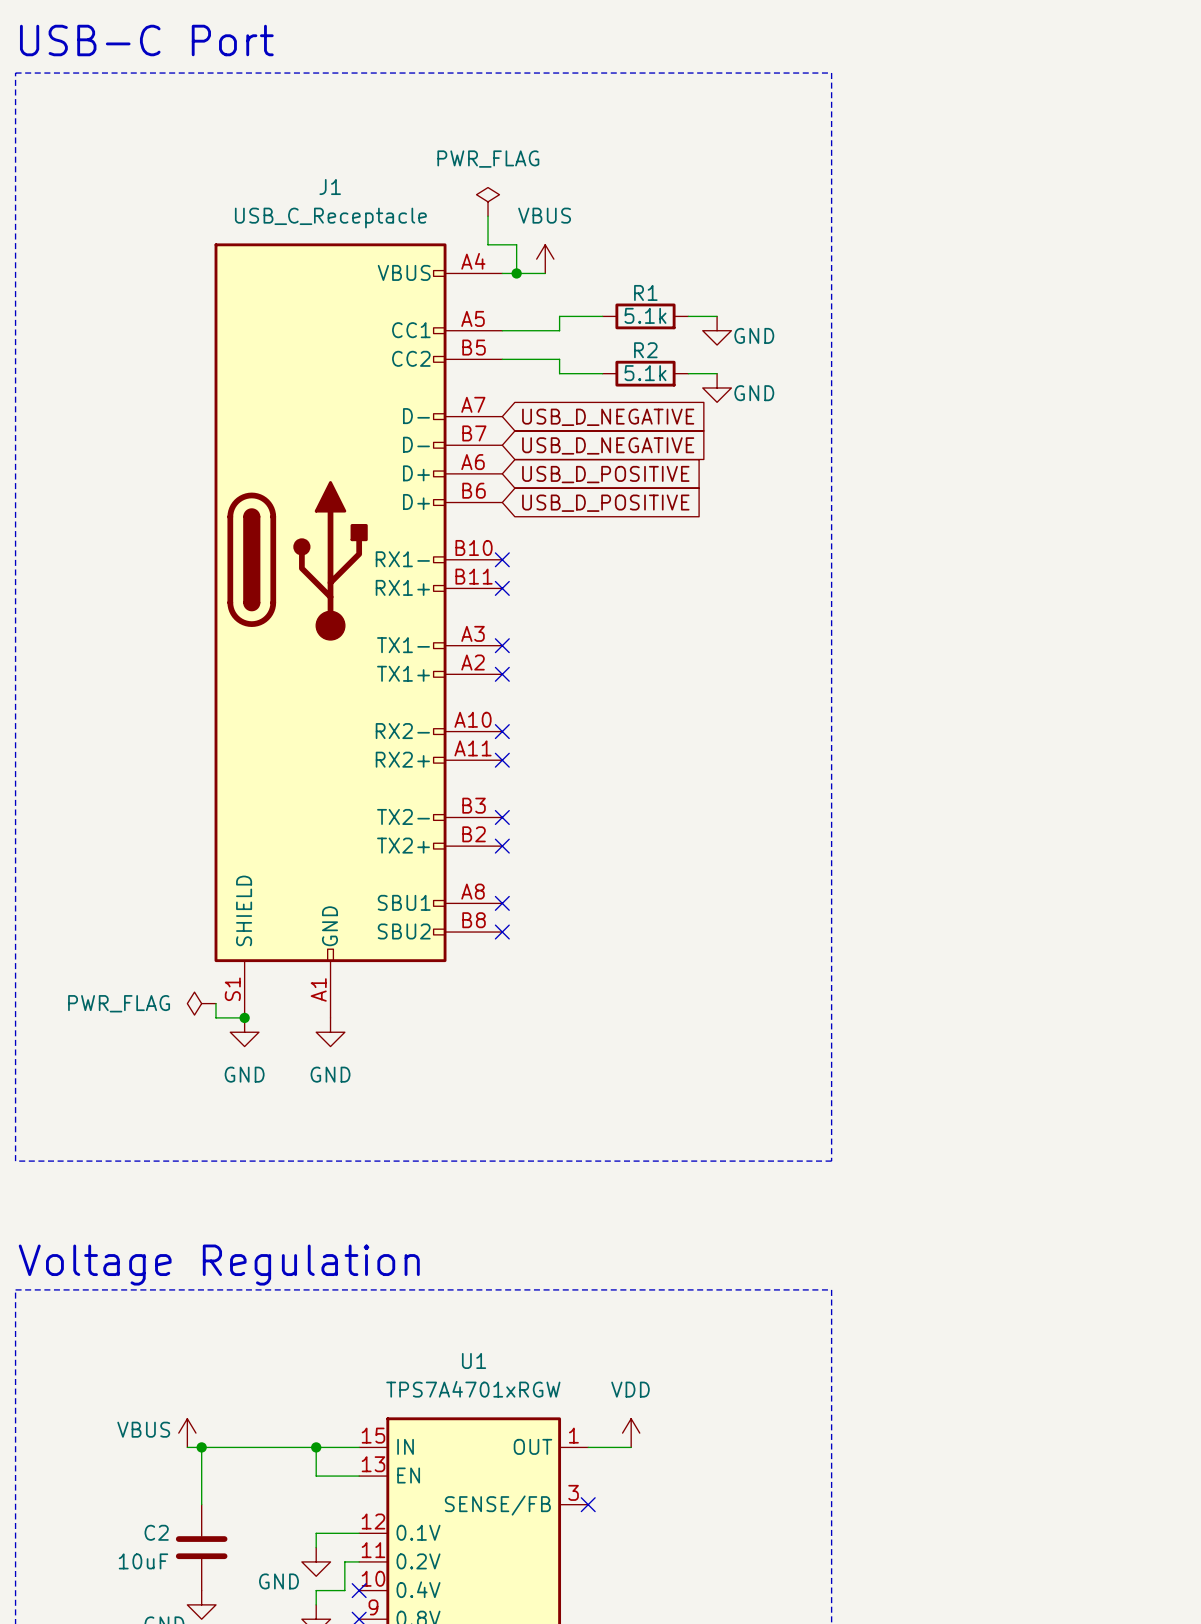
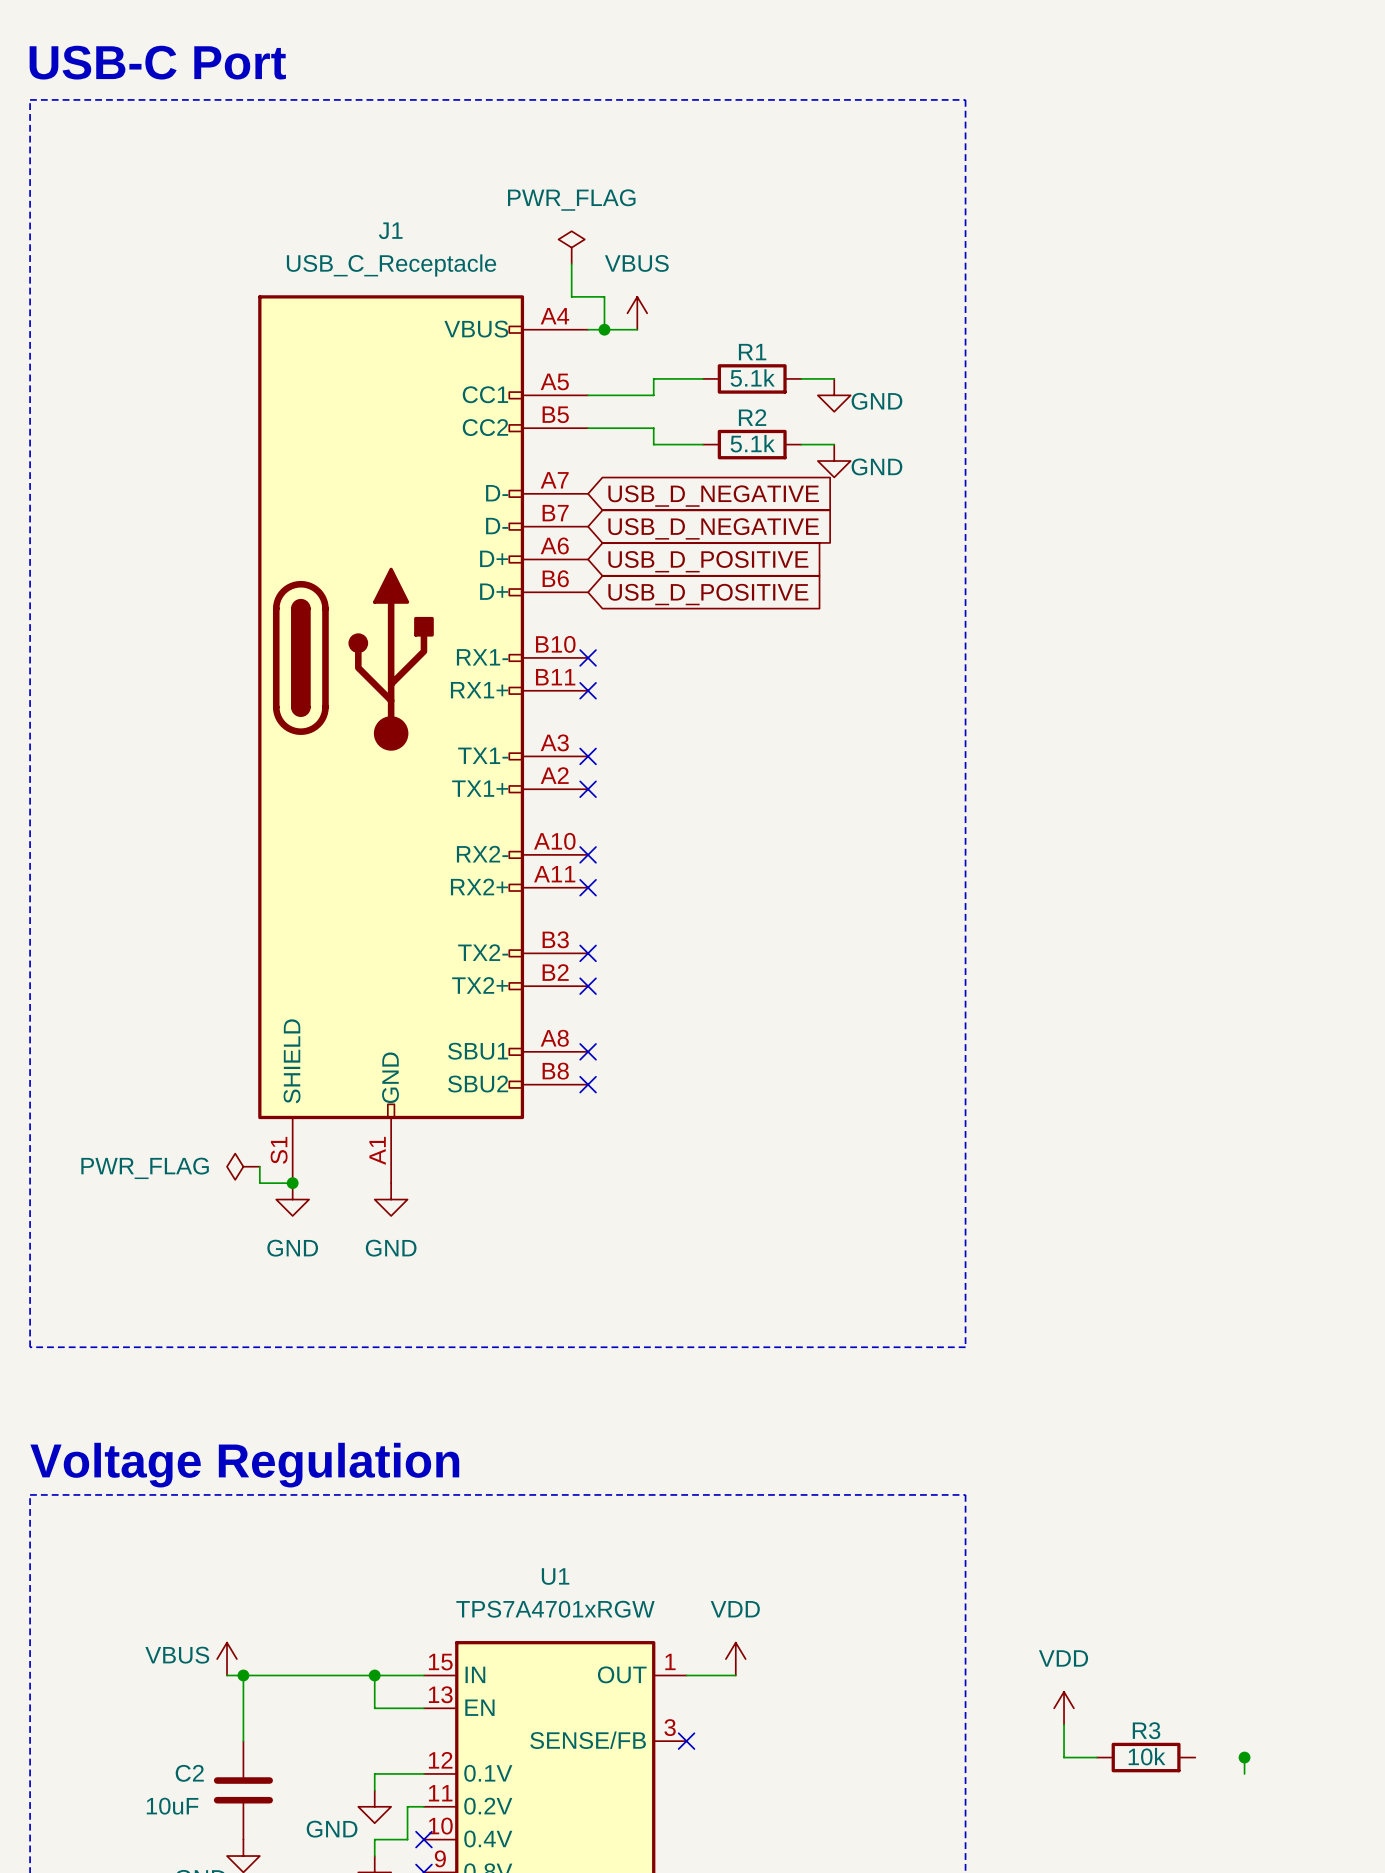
power symbol: none -> VDD (1064, 1708)
wire: none -> (1064, 1724) (1064, 1757) (1096, 1757)
R3: none -> 10k (1146, 1757)
wire: none -> (1244, 1757) (1244, 1773)
junction: none -> (1244, 1757)

